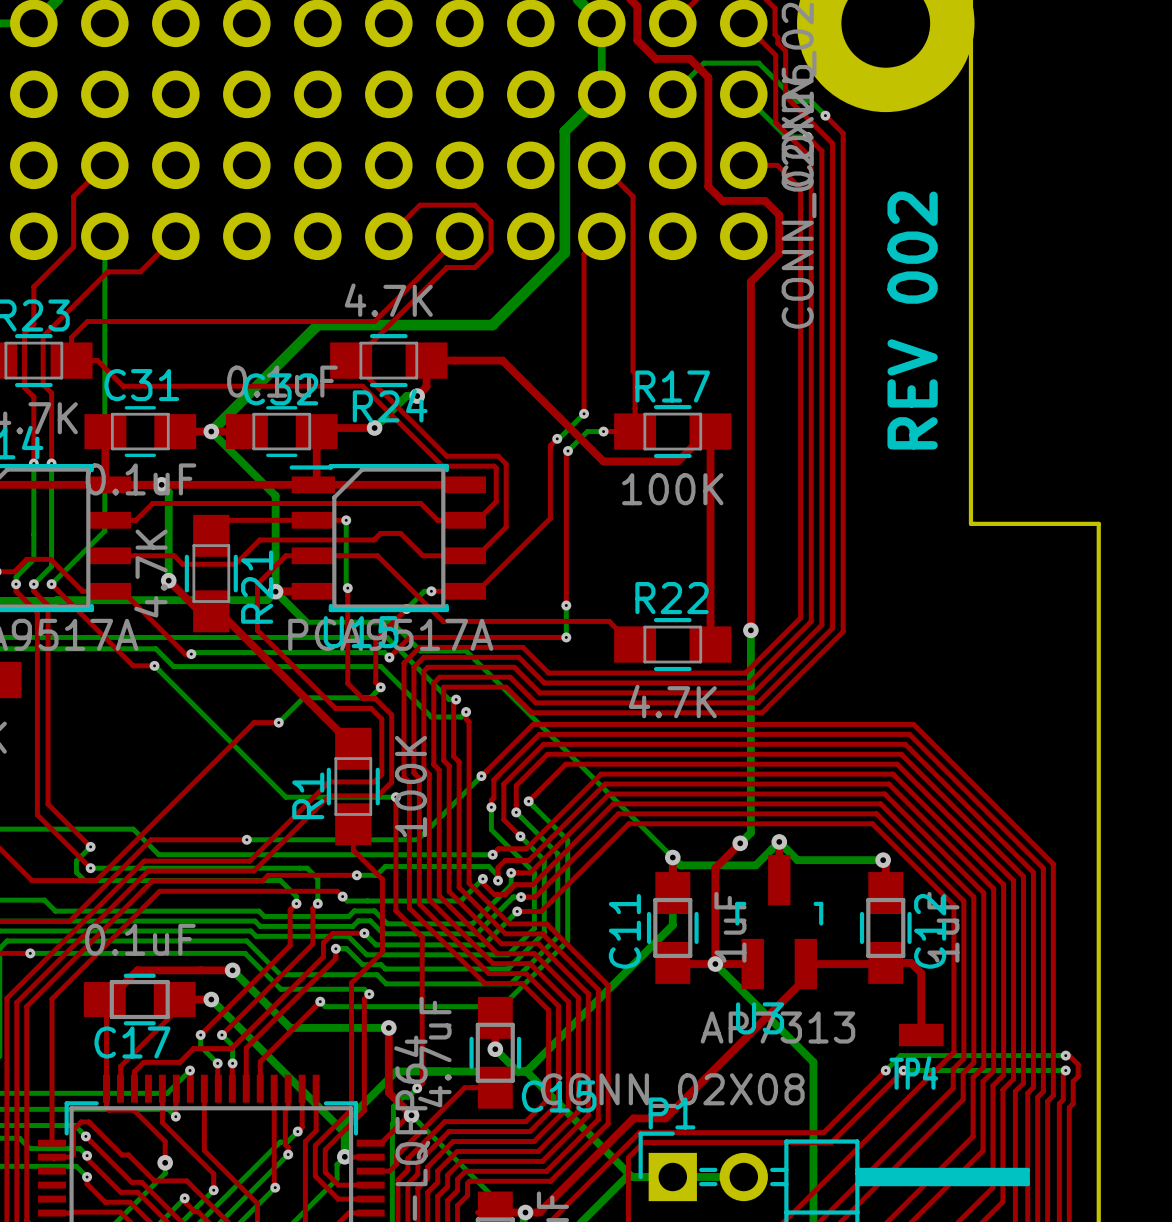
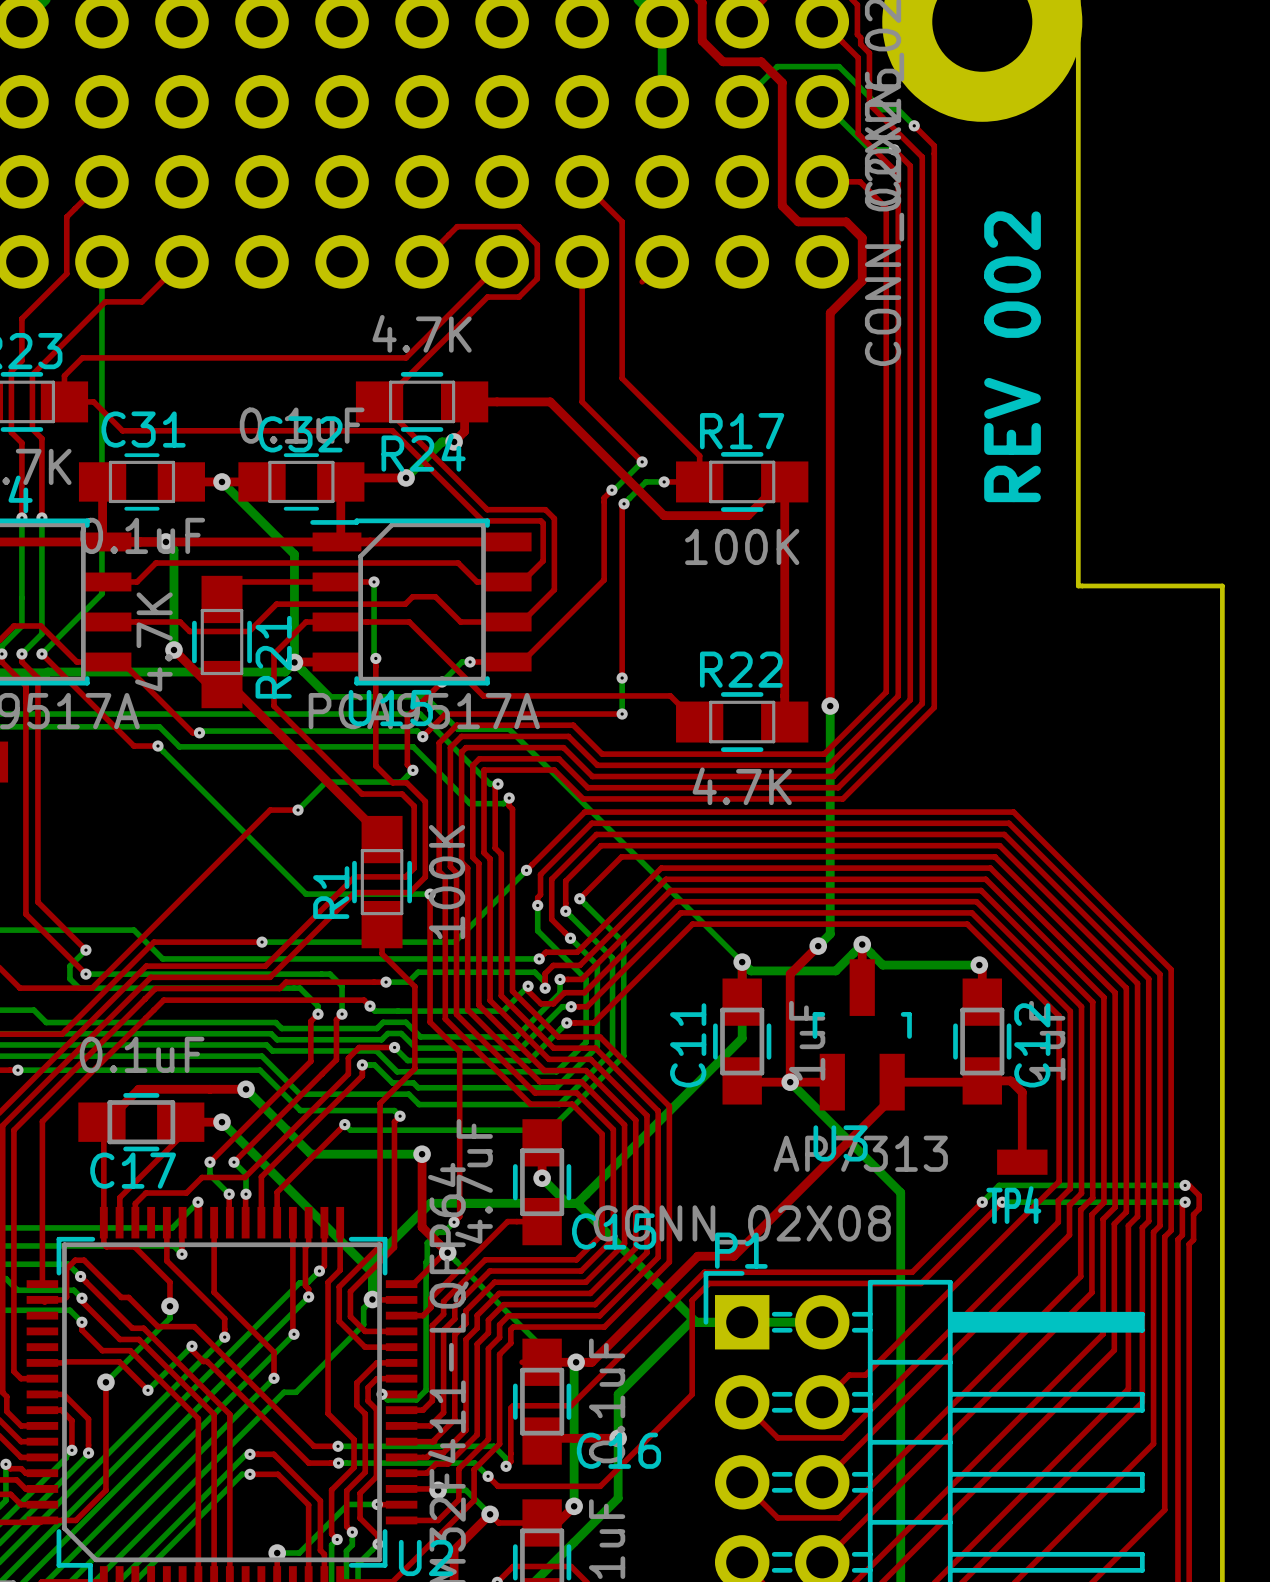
bottom track: (601, 94) (564, 131) (564, 252) (492, 325) (317, 325) (211, 431) -> none
top track: (601, 165) (633, 196) (633, 371) (635, 373) (635, 408) -> (582, 181) (622, 221) (622, 378) (699, 455)
top track: (584, 254) (584, 413) -> (582, 261) (582, 401) (642, 461)

